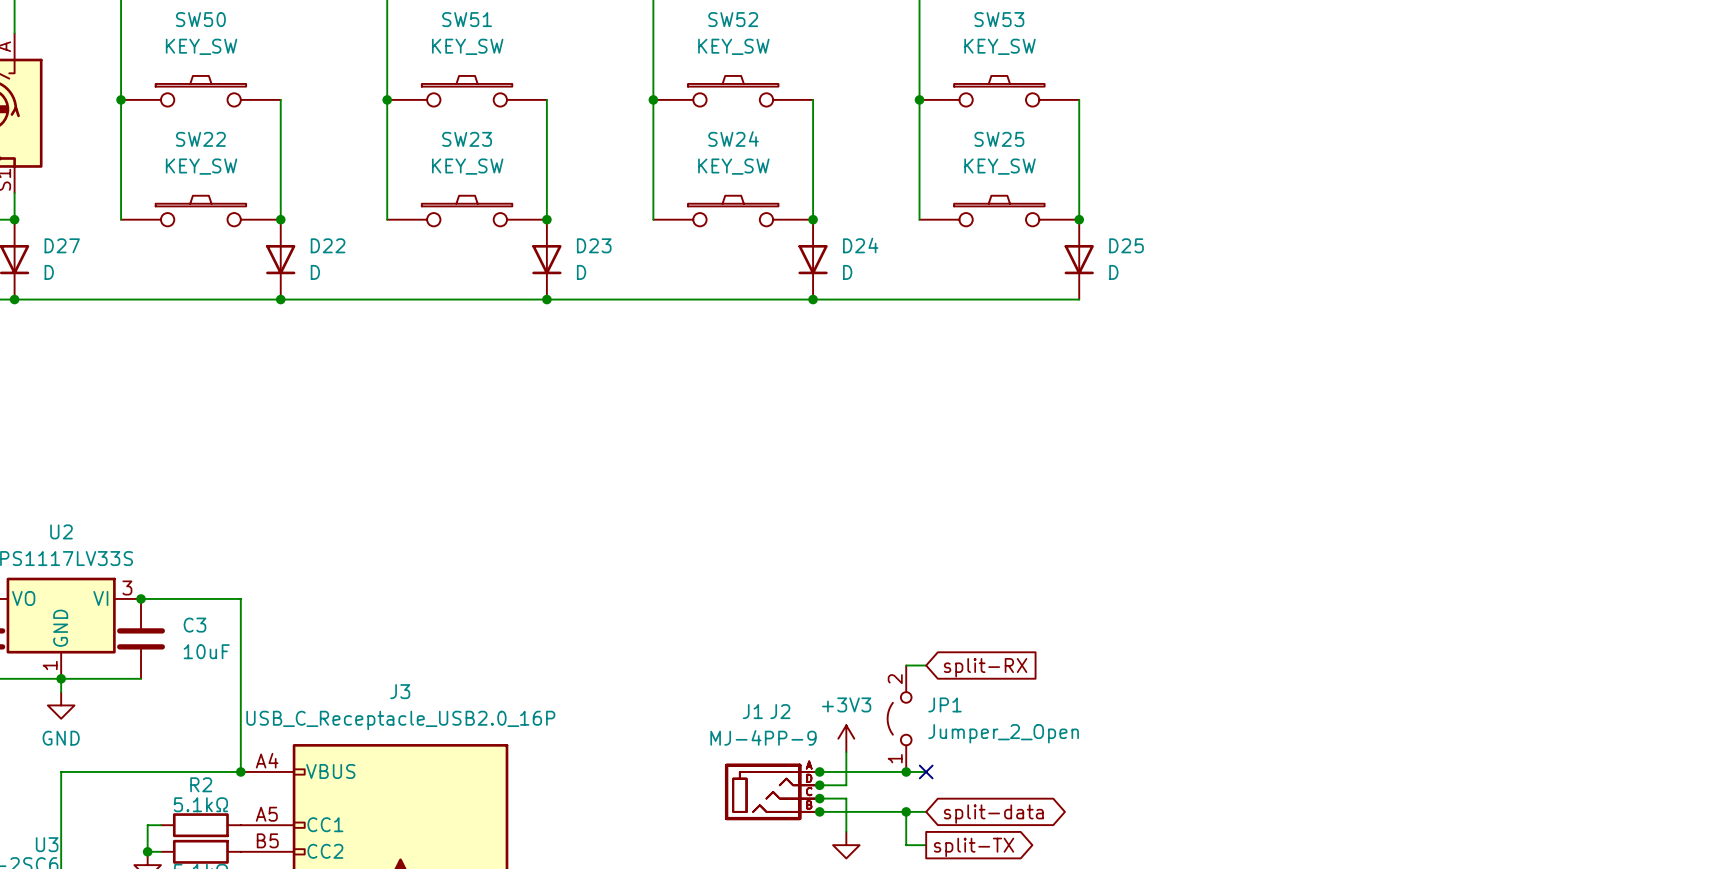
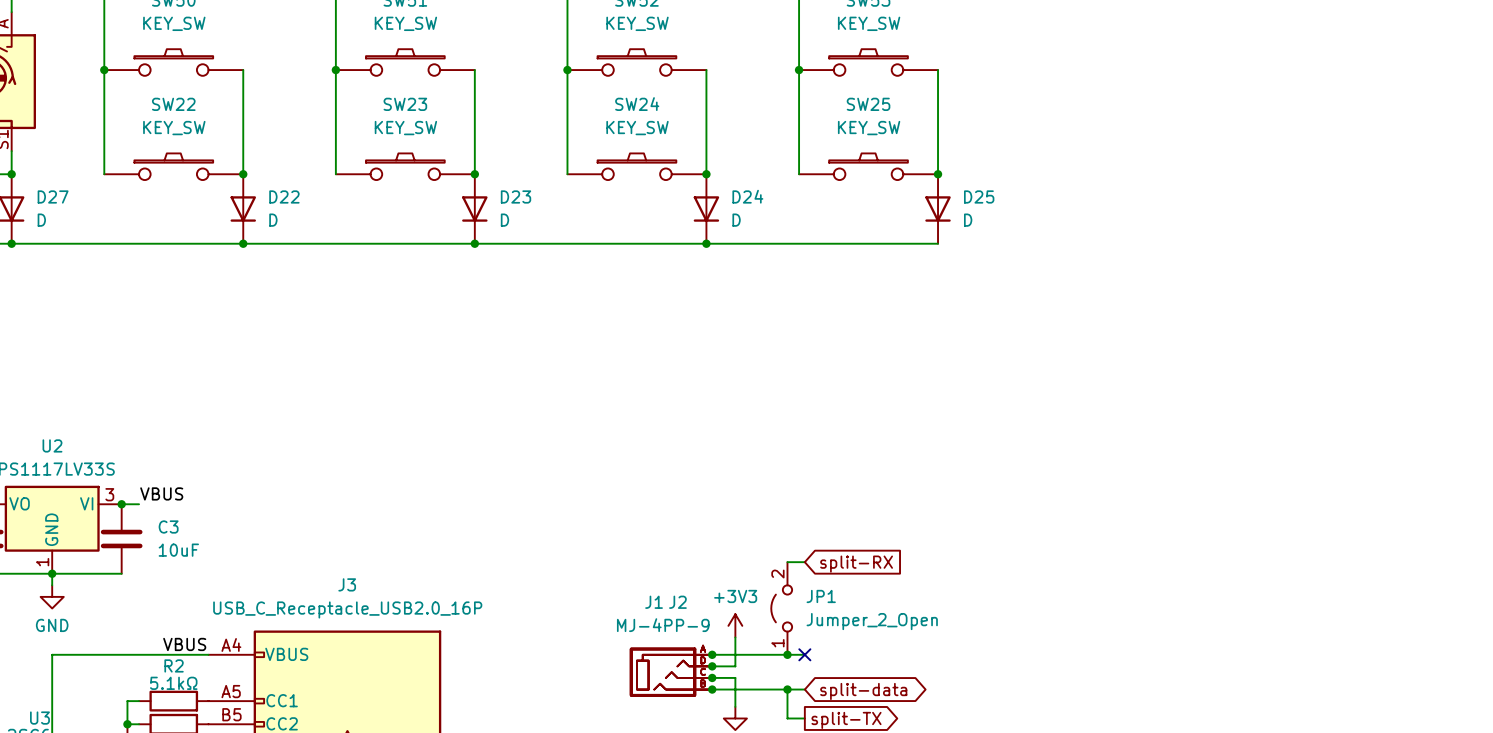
label: none -> VBUS (161, 493)
wire: (160, 598) (240, 598) (240, 771) -> none
label: none -> VBUS (184, 644)
junction: (240, 771) -> none

